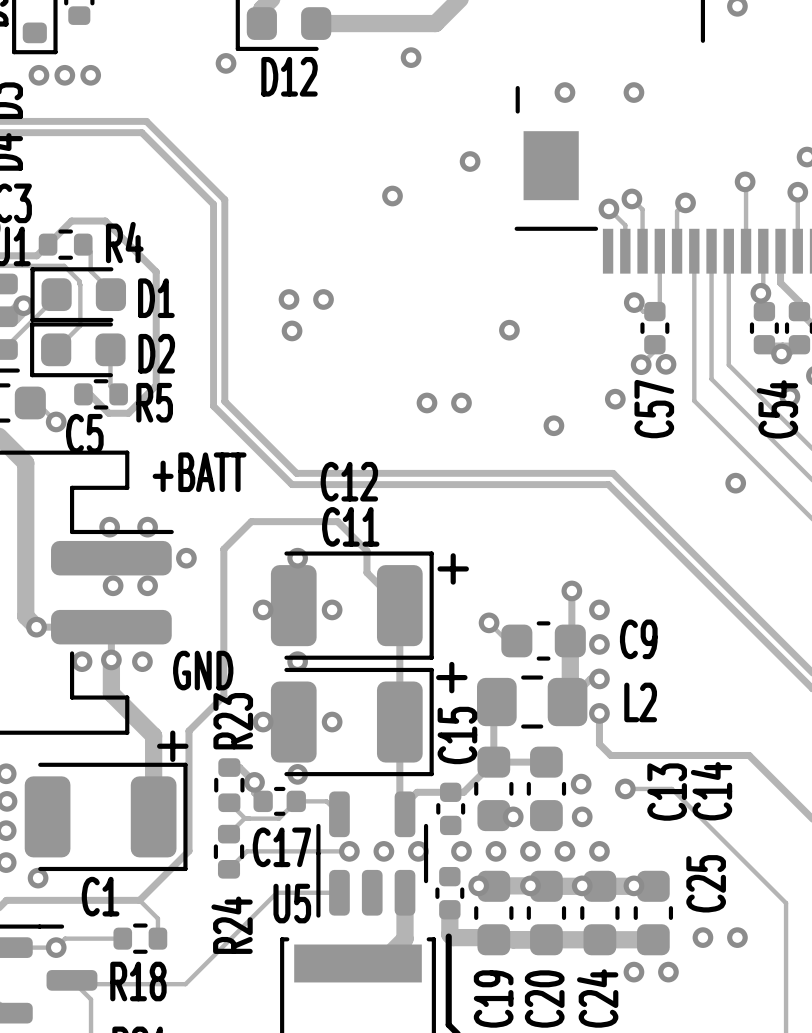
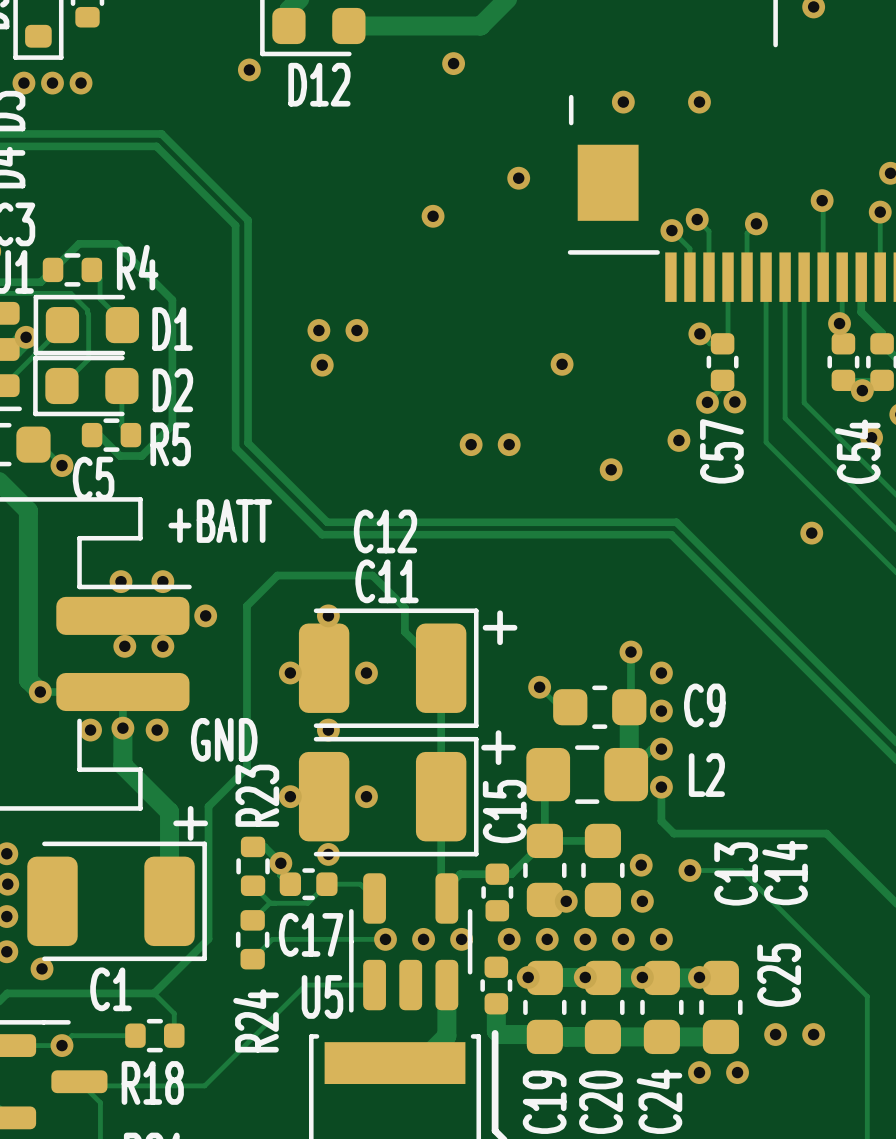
via: none -> (23, 83)
via: (38, 75) -> none
via: none -> (52, 83)
via: (64, 75) -> none
via: none -> (81, 83)
via: (90, 75) -> none

